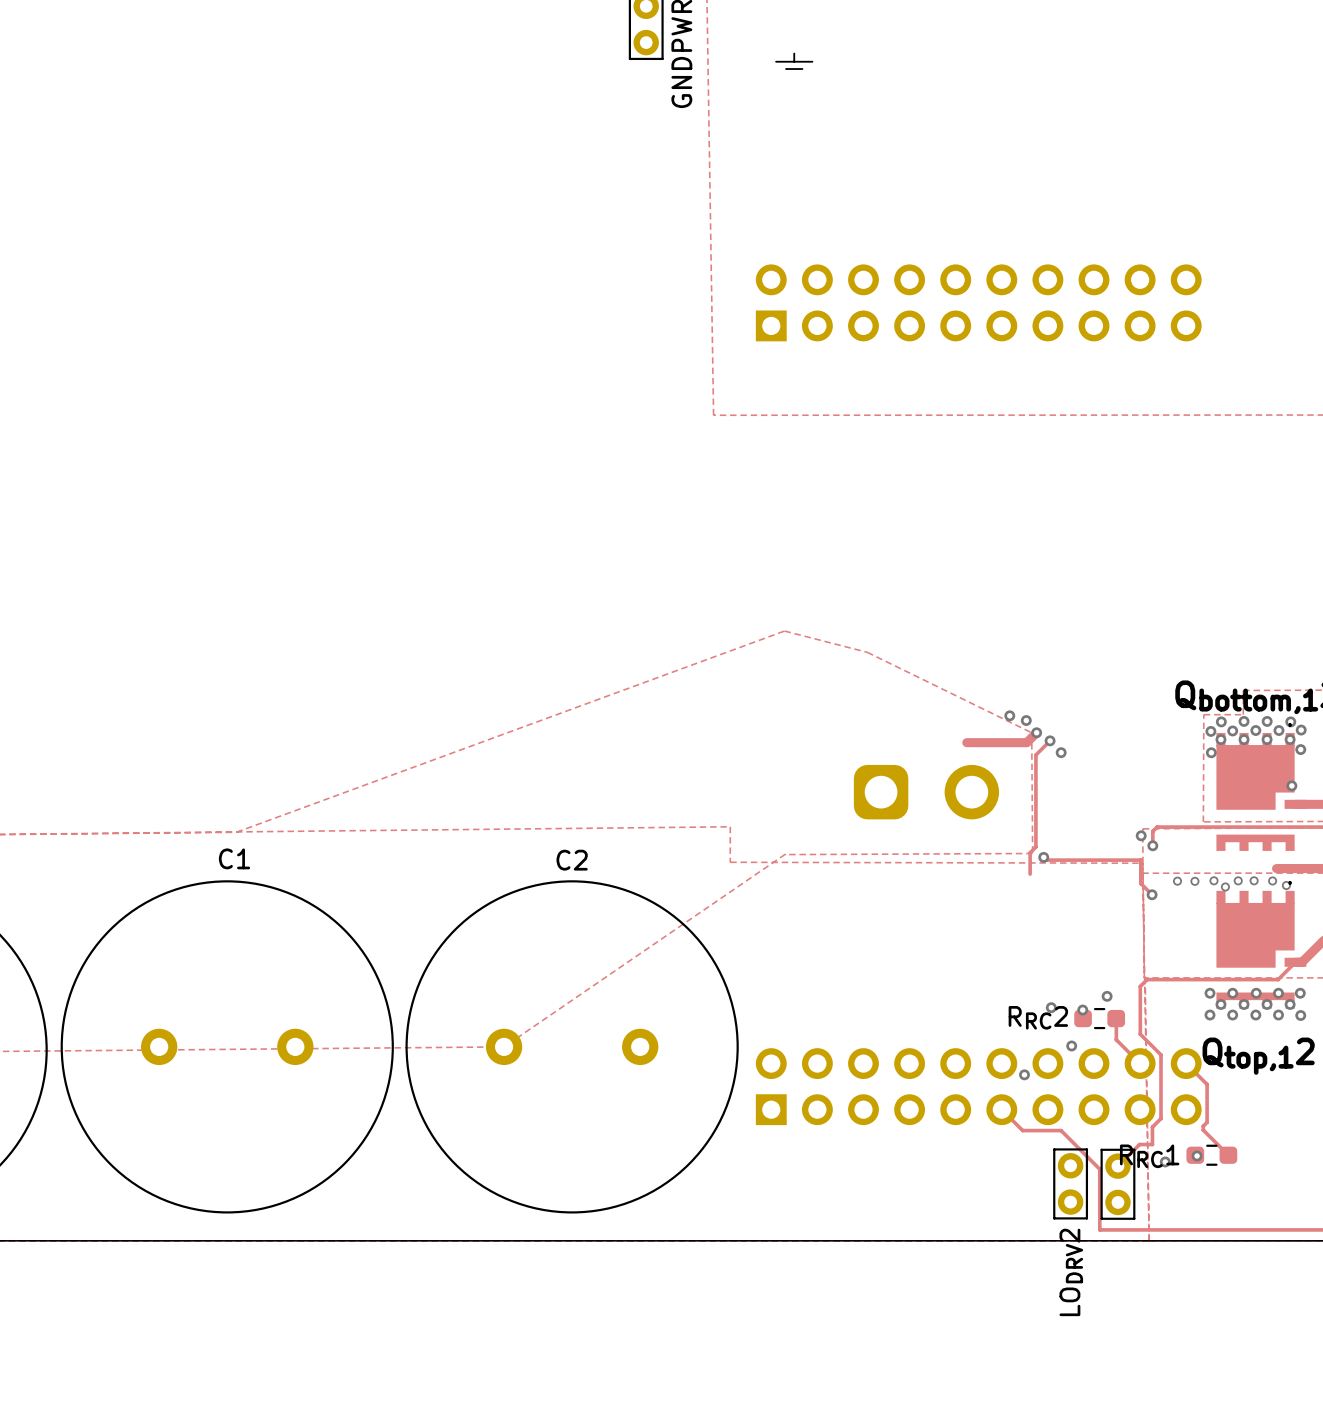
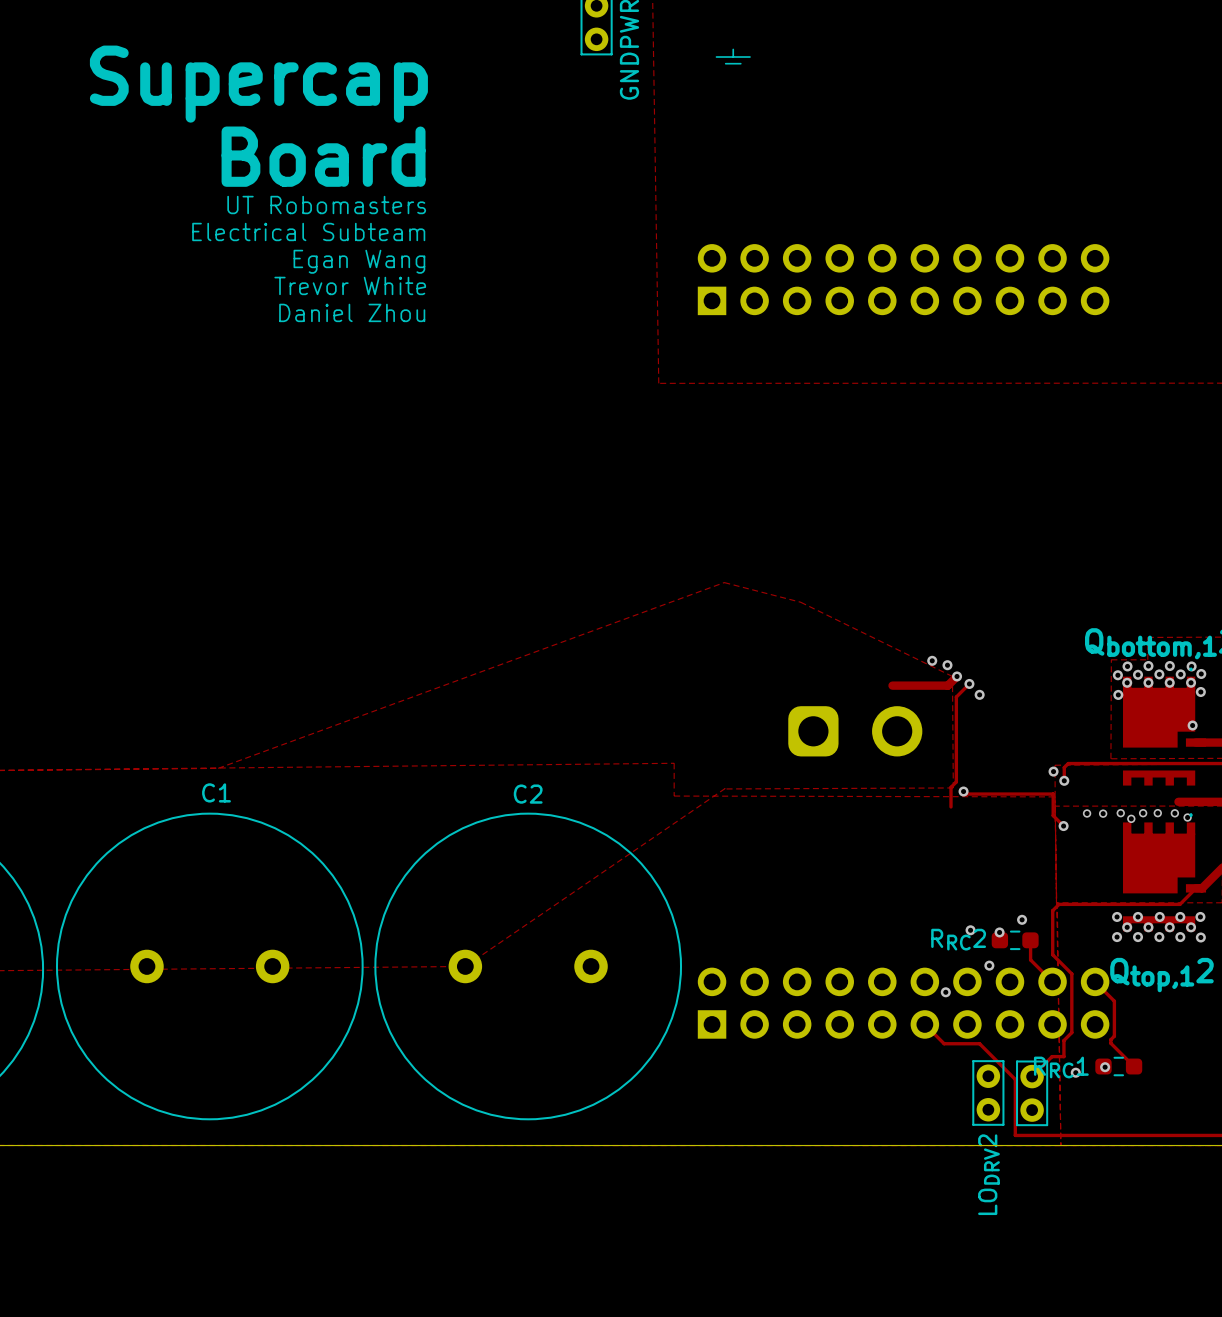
text: none -> Supercap (258, 84)
text: none -> Board (323, 156)
text: none -> UT Robomasters (326, 205)
text: none -> Electrical Subteam (308, 231)
text: none -> Egan Wang (359, 261)
text: none -> Trevor White (350, 285)
text: none -> Daniel Zhou (352, 312)

